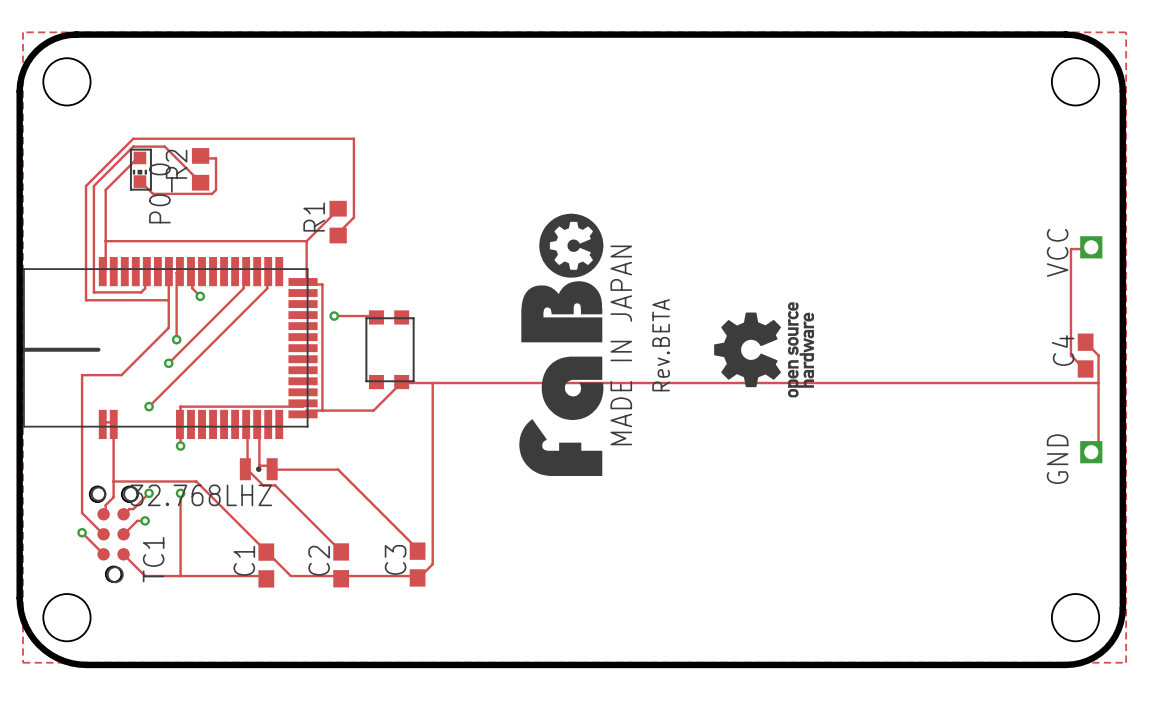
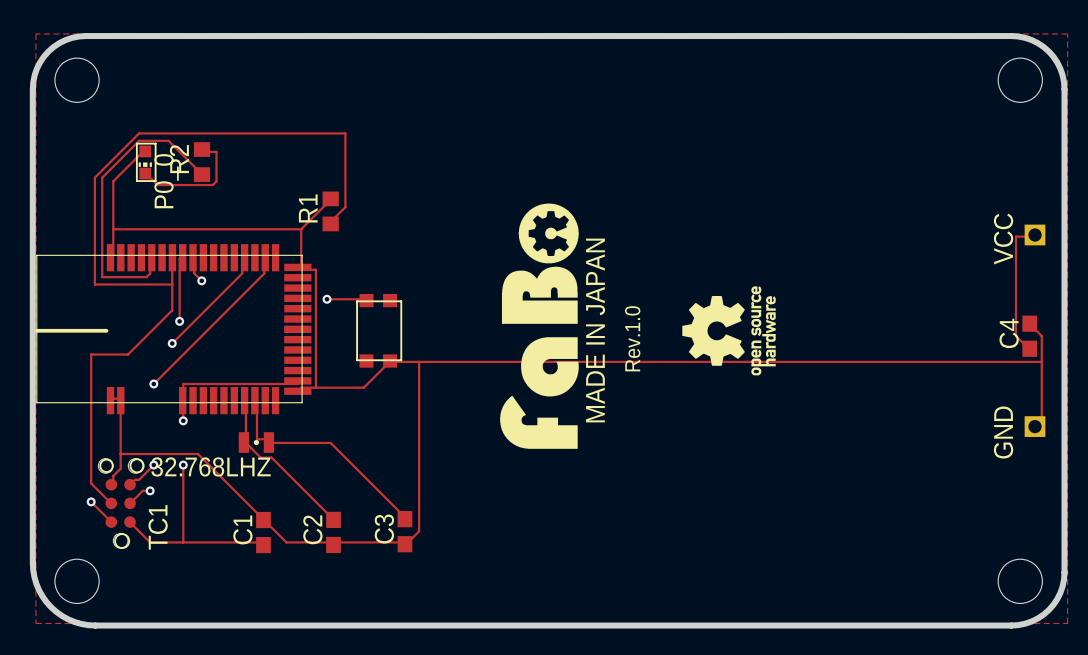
text: Rev.BETA (661, 345) -> Rev.1.0 (632, 338)

